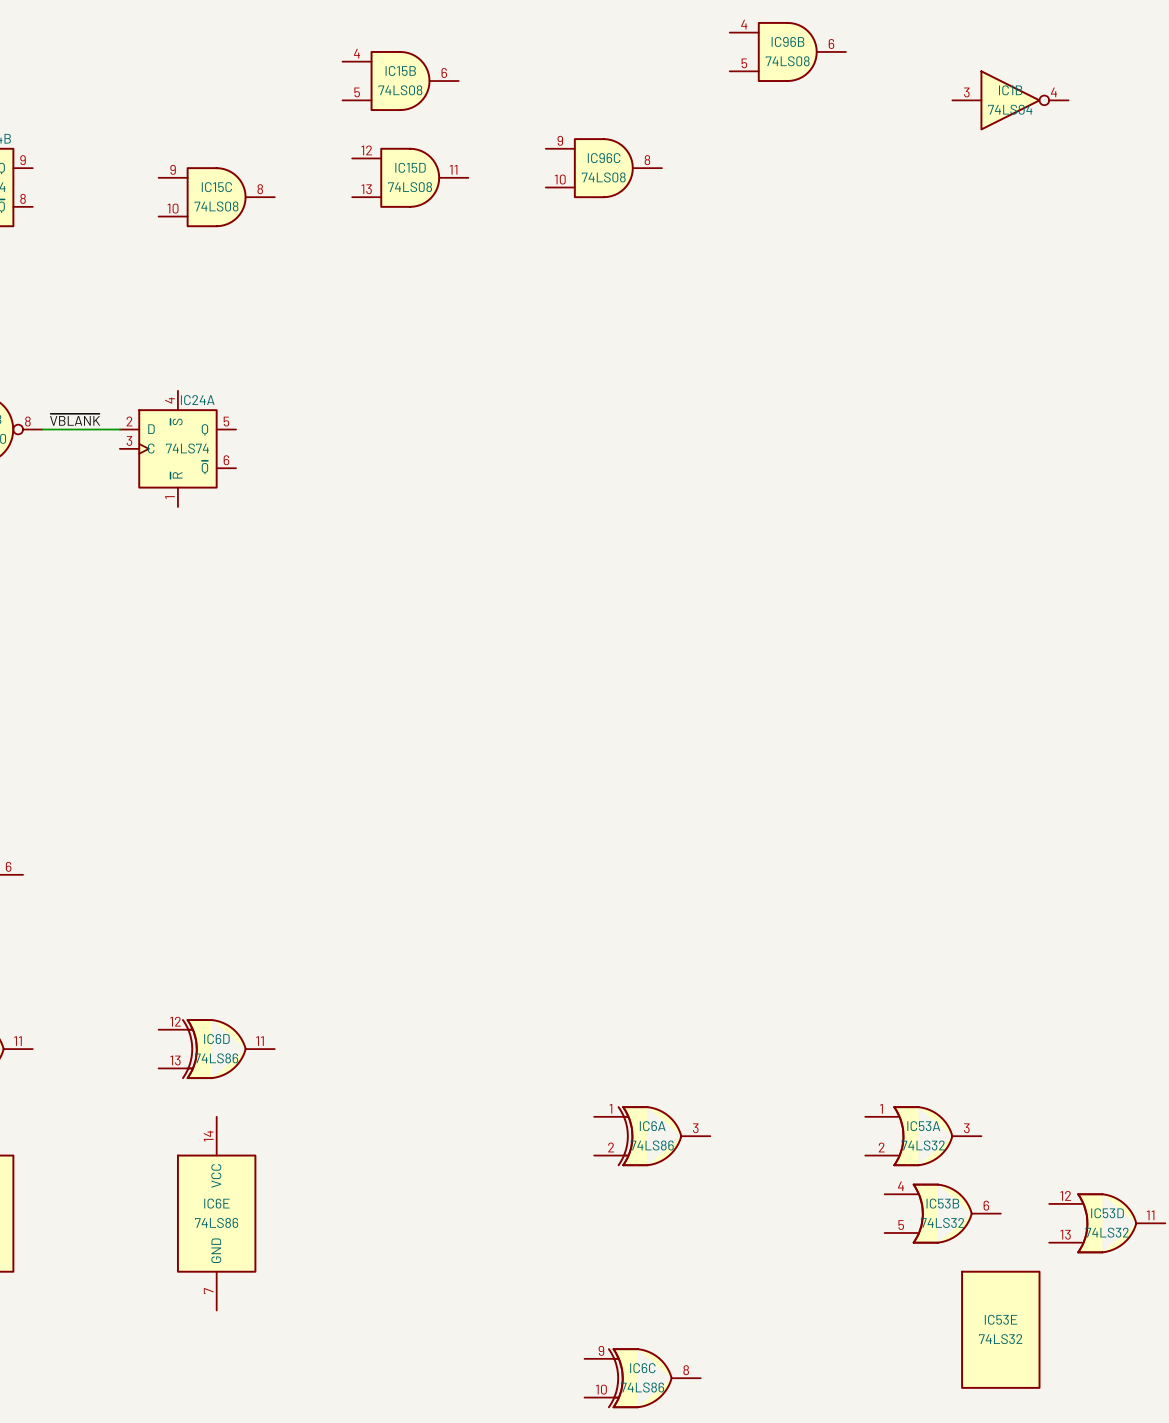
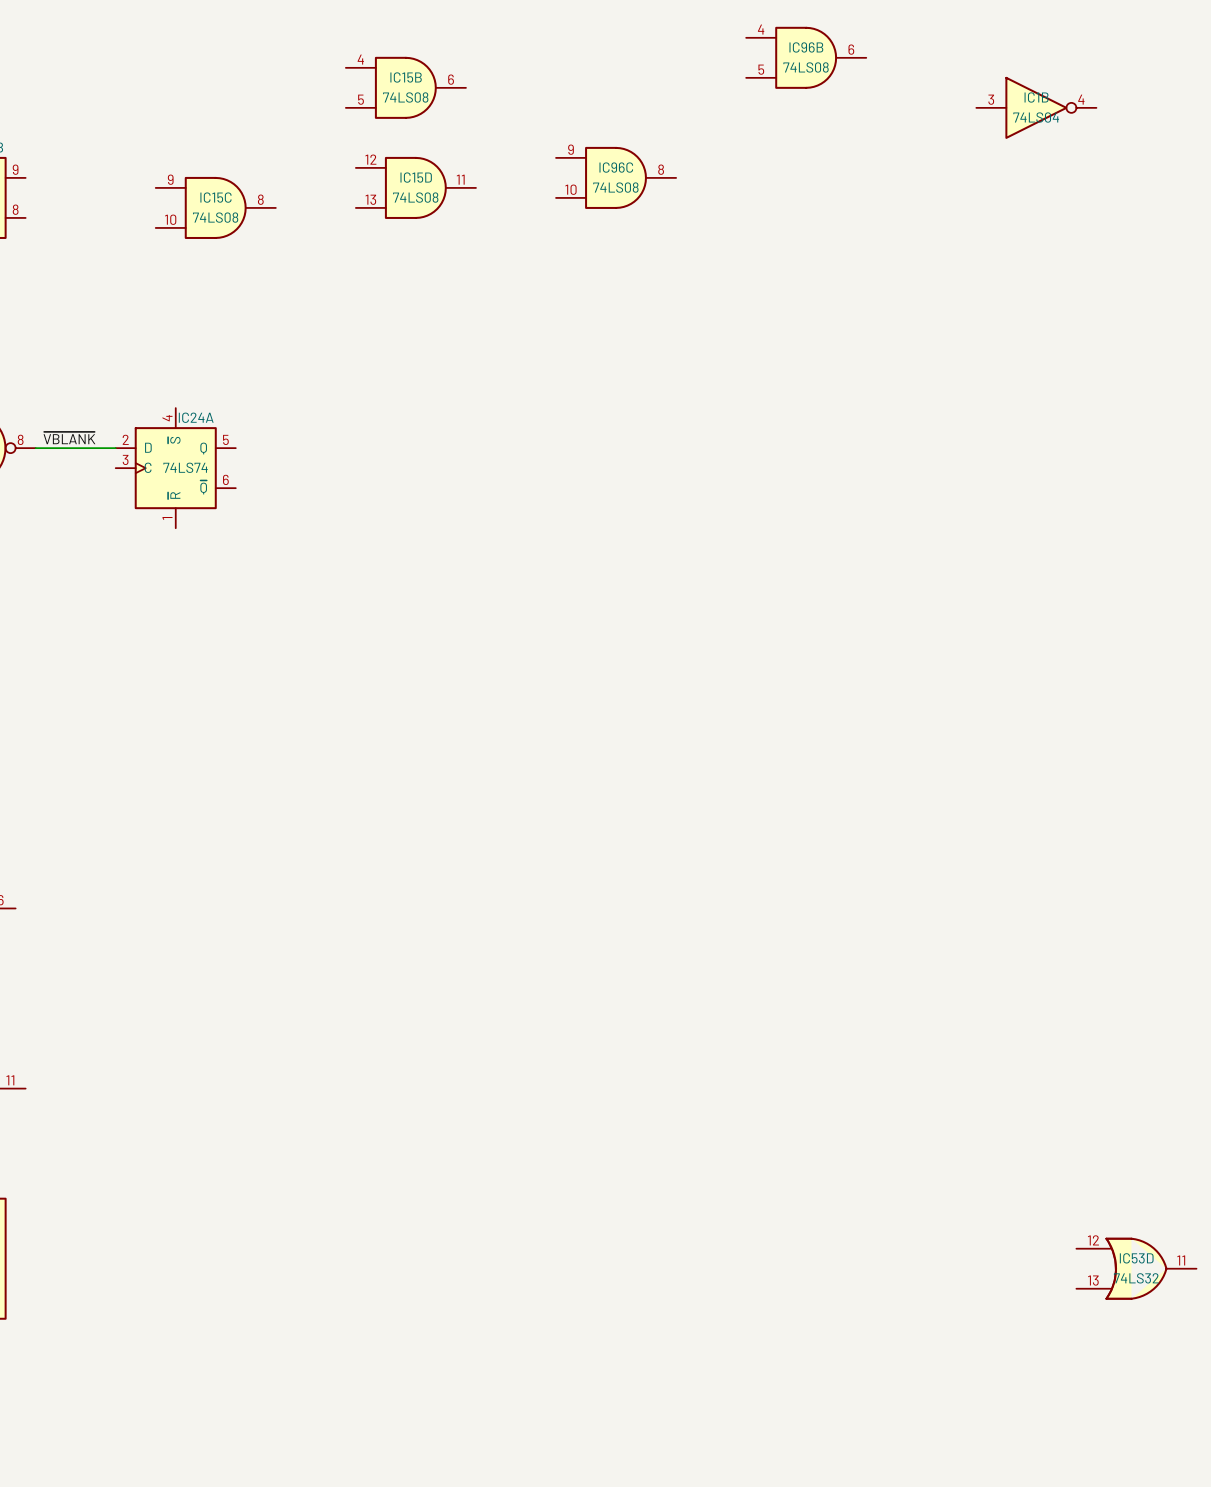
IC6D: 74LS86 (216, 1049) -> none
IC6A: 74LS86 (652, 1136) -> none
IC53A: 74LS32 (923, 1136) -> none
IC6E: 74LS86 (216, 1213) -> none
IC53B: 74LS32 (942, 1213) -> none
IC53E: 74LS32 (1000, 1329) -> none
IC6C: 74LS86 (642, 1378) -> none

